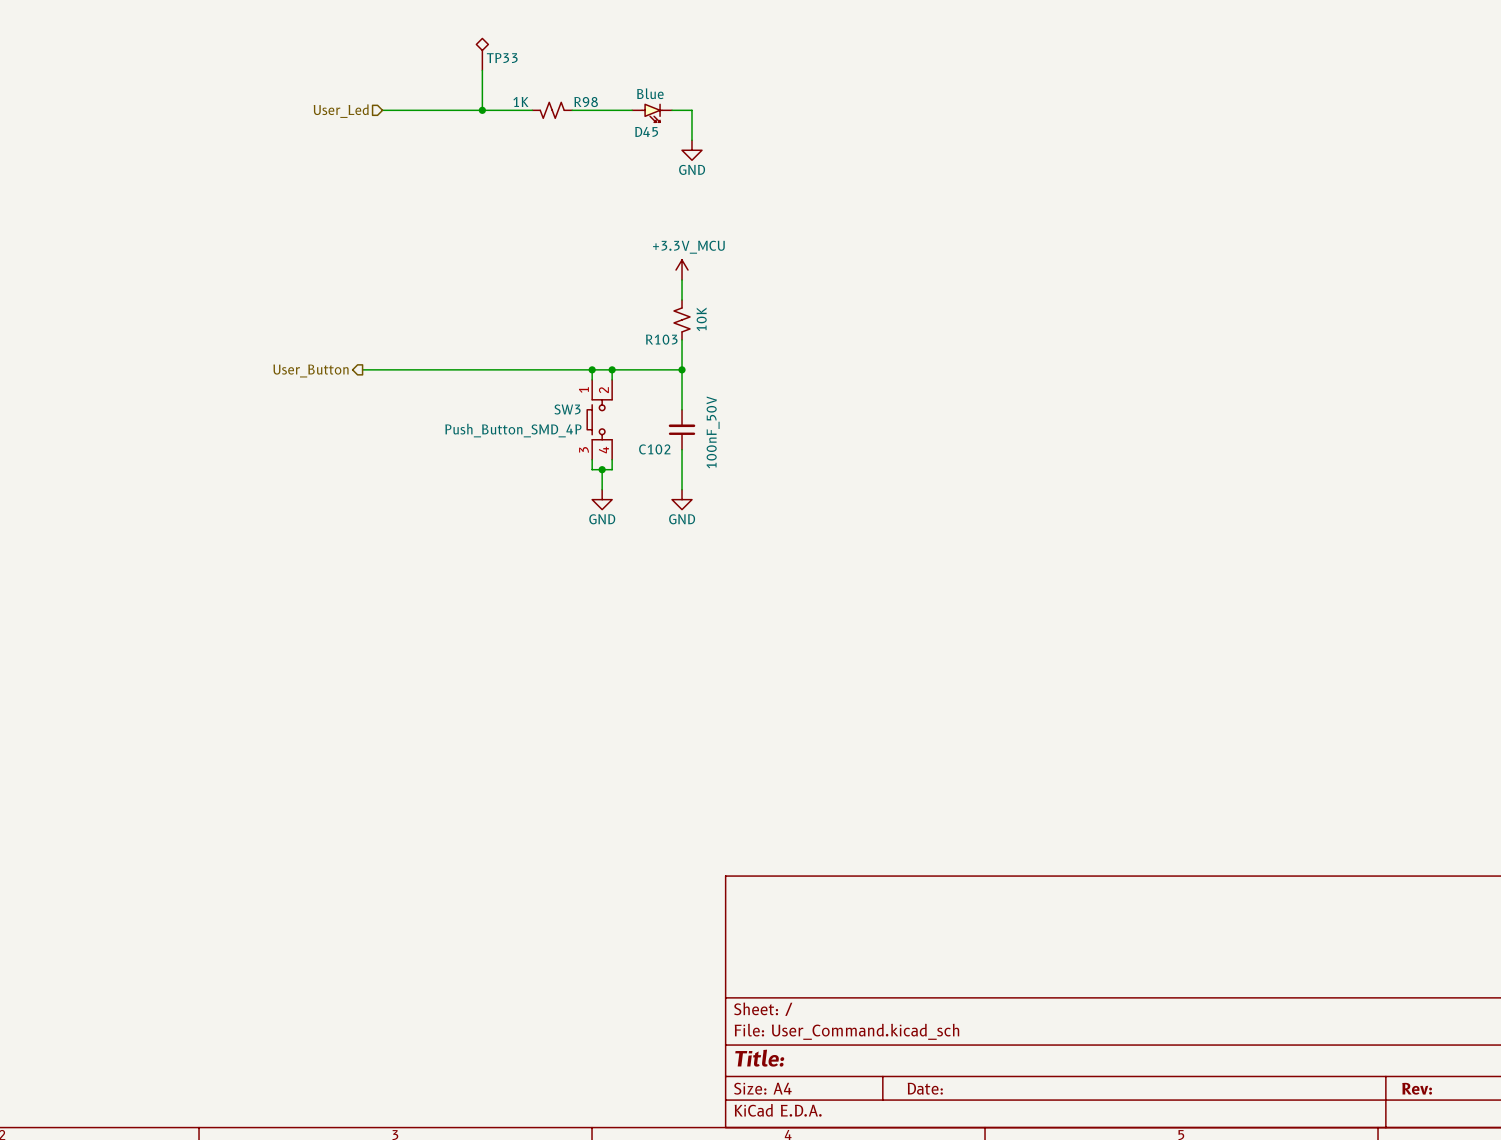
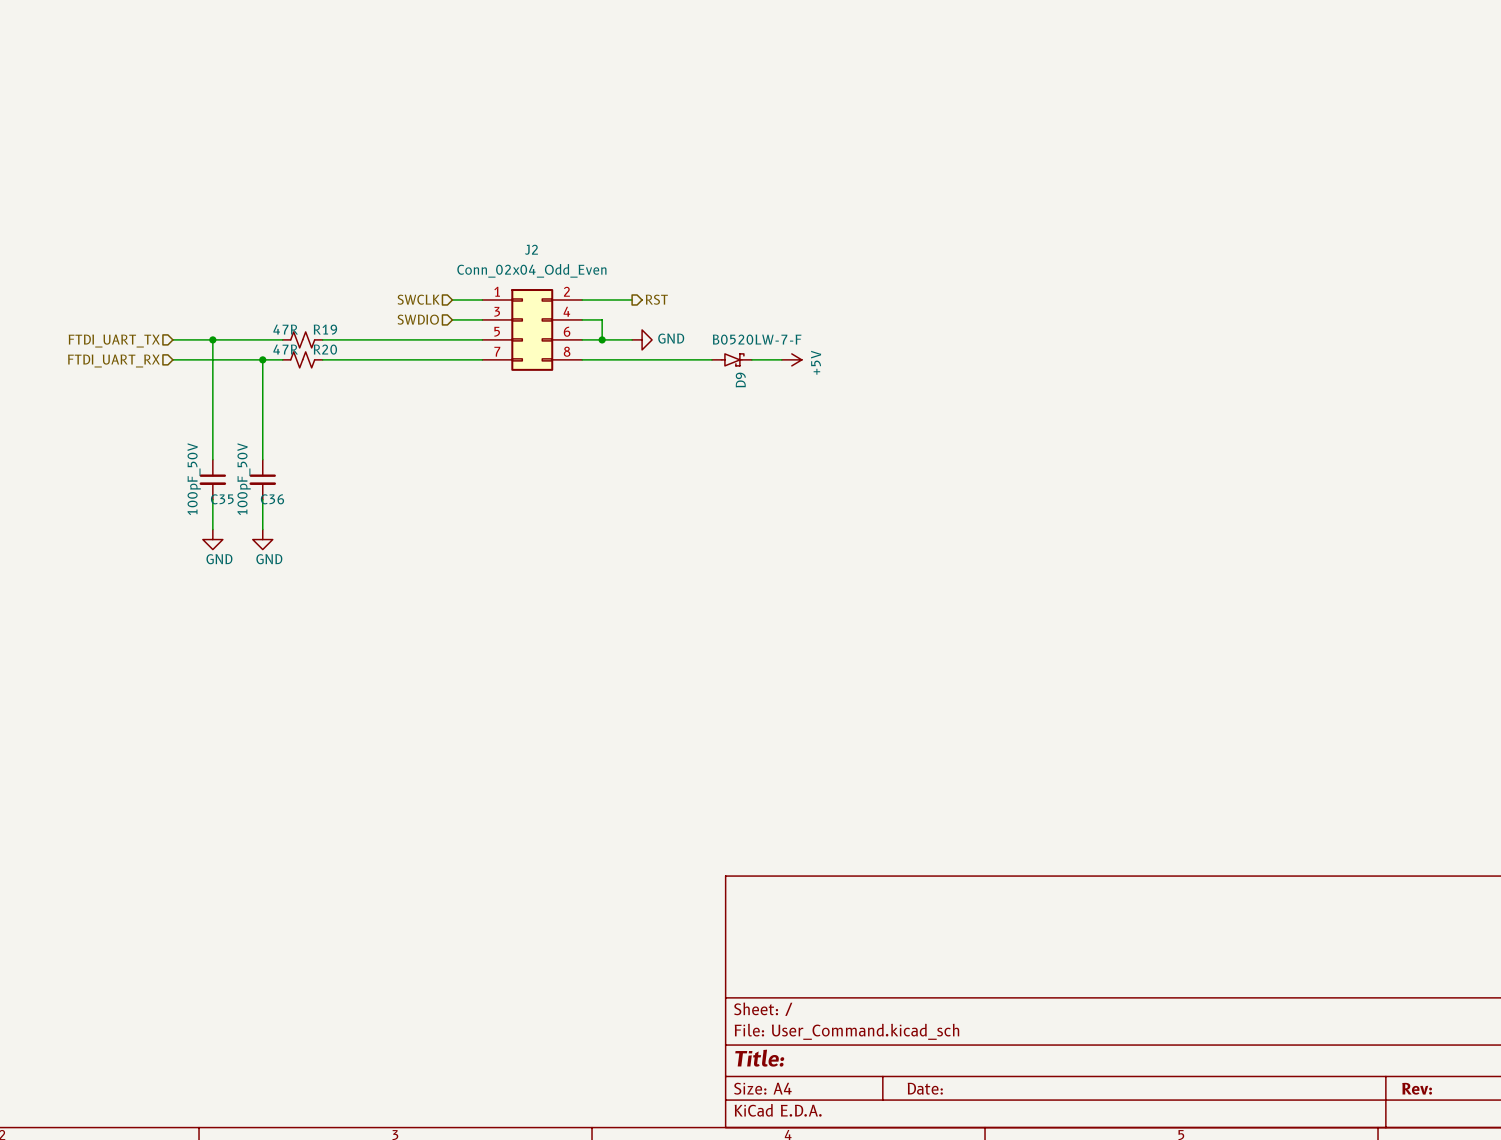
TP33: (482, 54) -> none
wire: (482, 70) (482, 110) -> none
wire: (382, 110) (532, 110) -> none
junction: (482, 110) -> none
R98: 1K (552, 110) -> none
wire: (572, 110) (632, 110) -> none
wire: (672, 110) (691, 110) (691, 140) -> none
hierarchical label: User_Led (341, 111) -> none
D45: Blue (652, 113) -> none
power symbol: GND (691, 150) -> none
power symbol: +3.3V_MCU (682, 270) -> none
wire: (682, 280) (682, 299) -> none
hierarchical label: none -> SWCLK (418, 299)
wire: none -> (452, 299) (482, 299)
wire: none -> (582, 299) (632, 299)
hierarchical label: none -> RST (656, 299)
hierarchical label: none -> SWDIO (418, 319)
wire: none -> (452, 319) (482, 319)
wire: none -> (582, 319) (602, 319) (602, 339)
R103: 10K (682, 319) -> none
J2: none -> Conn_02x04_Odd_Even (532, 329)
wire: none -> (172, 339) (282, 339)
wire: none -> (212, 339) (212, 459)
junction: none -> (212, 339)
R19: none -> 47R (302, 339)
wire: none -> (322, 339) (482, 339)
wire: none -> (582, 339) (632, 339)
junction: none -> (602, 339)
power symbol: none -> GND (642, 339)
wire: (682, 339) (682, 409) -> none
hierarchical label: none -> FTDI_UART_TX (114, 341)
wire: none -> (172, 359) (282, 359)
wire: none -> (262, 359) (262, 459)
junction: none -> (262, 359)
R20: none -> 47R (302, 359)
wire: none -> (322, 359) (482, 359)
wire: none -> (582, 359) (711, 359)
D9: none -> B0520LW-7-F (731, 359)
wire: none -> (751, 359) (781, 359)
power symbol: none -> +5V (791, 359)
hierarchical label: none -> FTDI_UART_RX (113, 361)
wire: (362, 369) (682, 369) -> none
wire: (592, 369) (592, 379) -> none
junction: (592, 369) -> none
wire: (612, 369) (612, 379) -> none
junction: (612, 369) -> none
junction: (682, 369) -> none
hierarchical label: User_Button (310, 370) -> none
SW3: Push_Button_SMD_4P (599, 419) -> none
C102: 100nF_50V (682, 429) -> none
wire: (682, 449) (682, 489) -> none
wire: (592, 459) (592, 469) (612, 469) (612, 459) -> none
wire: (602, 469) (602, 489) -> none
junction: (602, 469) -> none
C35: none -> 100pF_50V (212, 479)
C36: none -> 100pF_50V (262, 479)
wire: none -> (212, 499) (212, 529)
wire: none -> (262, 499) (262, 529)
power symbol: GND (602, 499) -> none
power symbol: GND (682, 499) -> none
power symbol: none -> GND (212, 539)
power symbol: none -> GND (262, 539)

